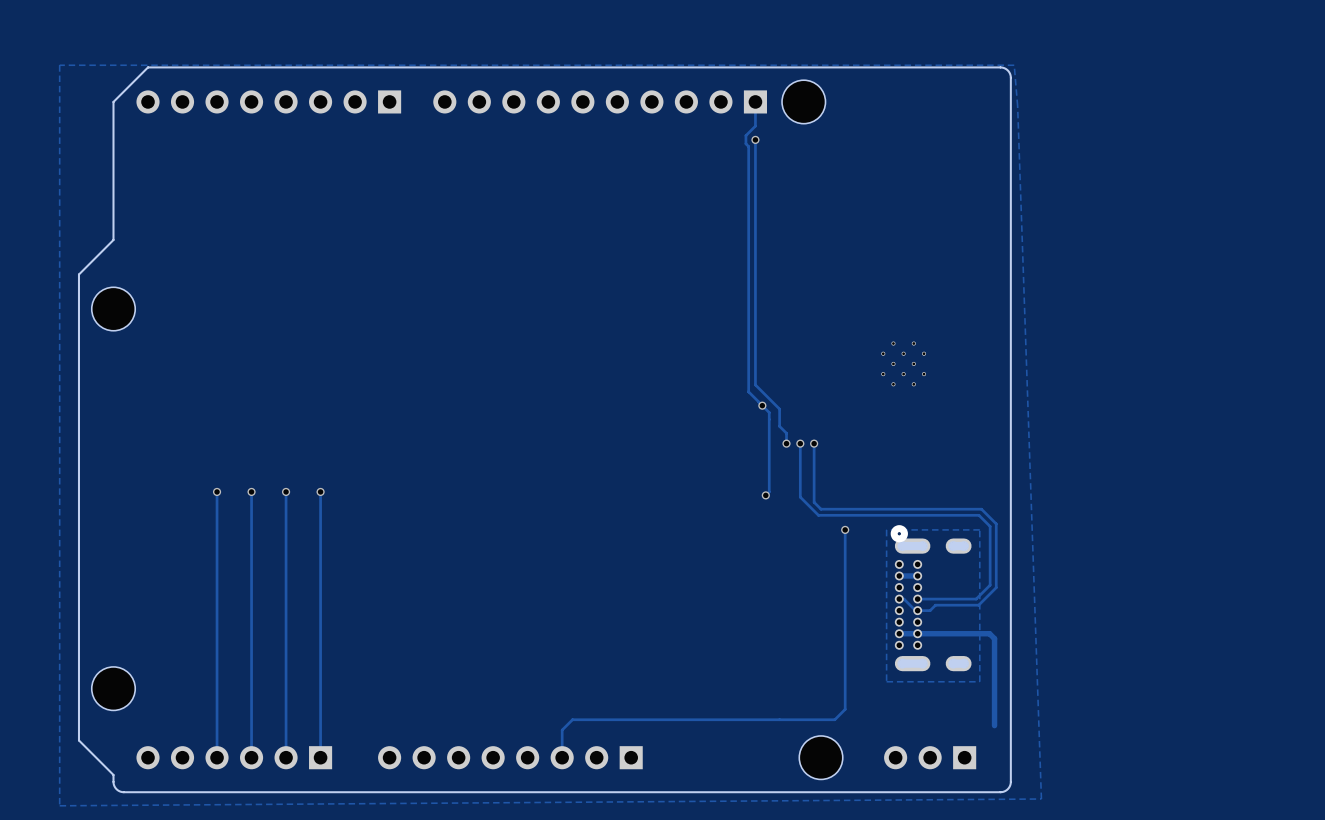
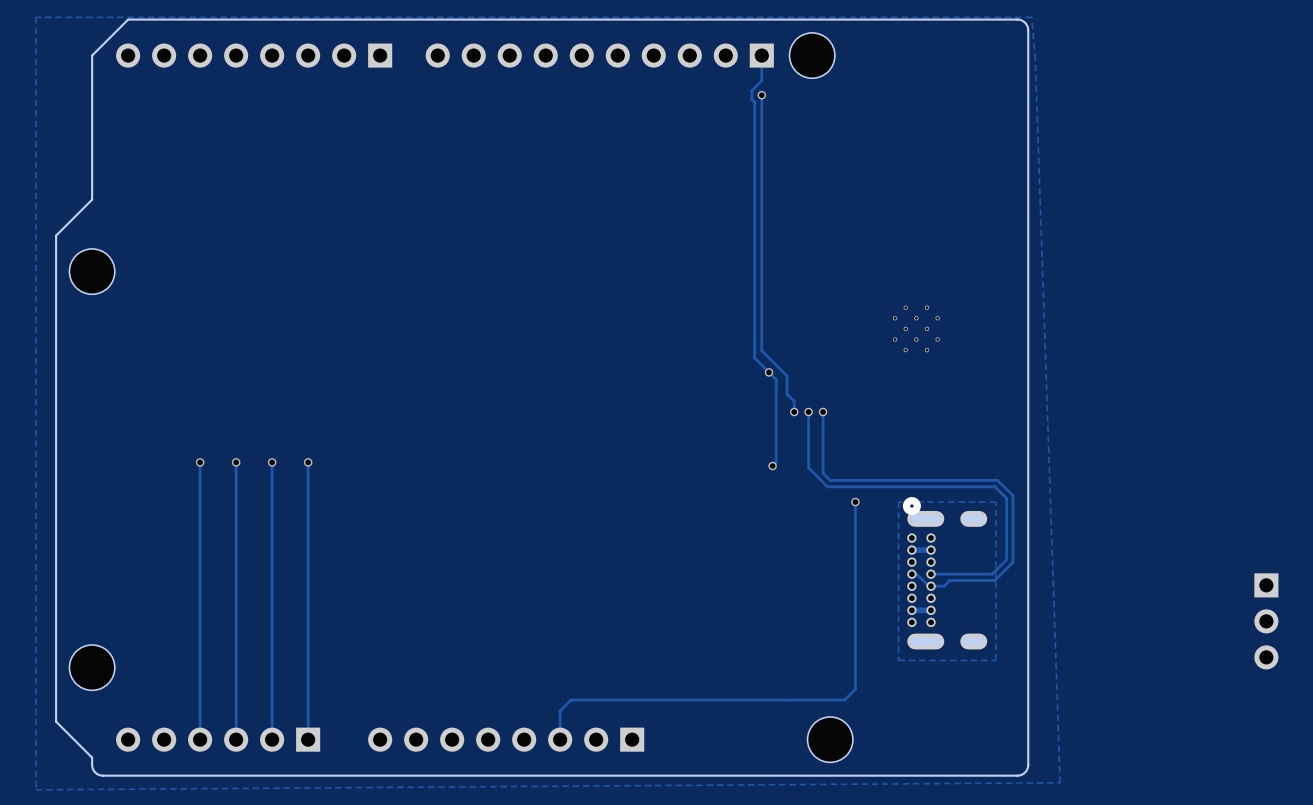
track: (917, 633) (989, 633) (994, 638) (994, 725) -> none
part rotation: 0° (930, 757) -> 90° counterclockwise (1266, 621)
part position: (930, 757) -> (1266, 621)

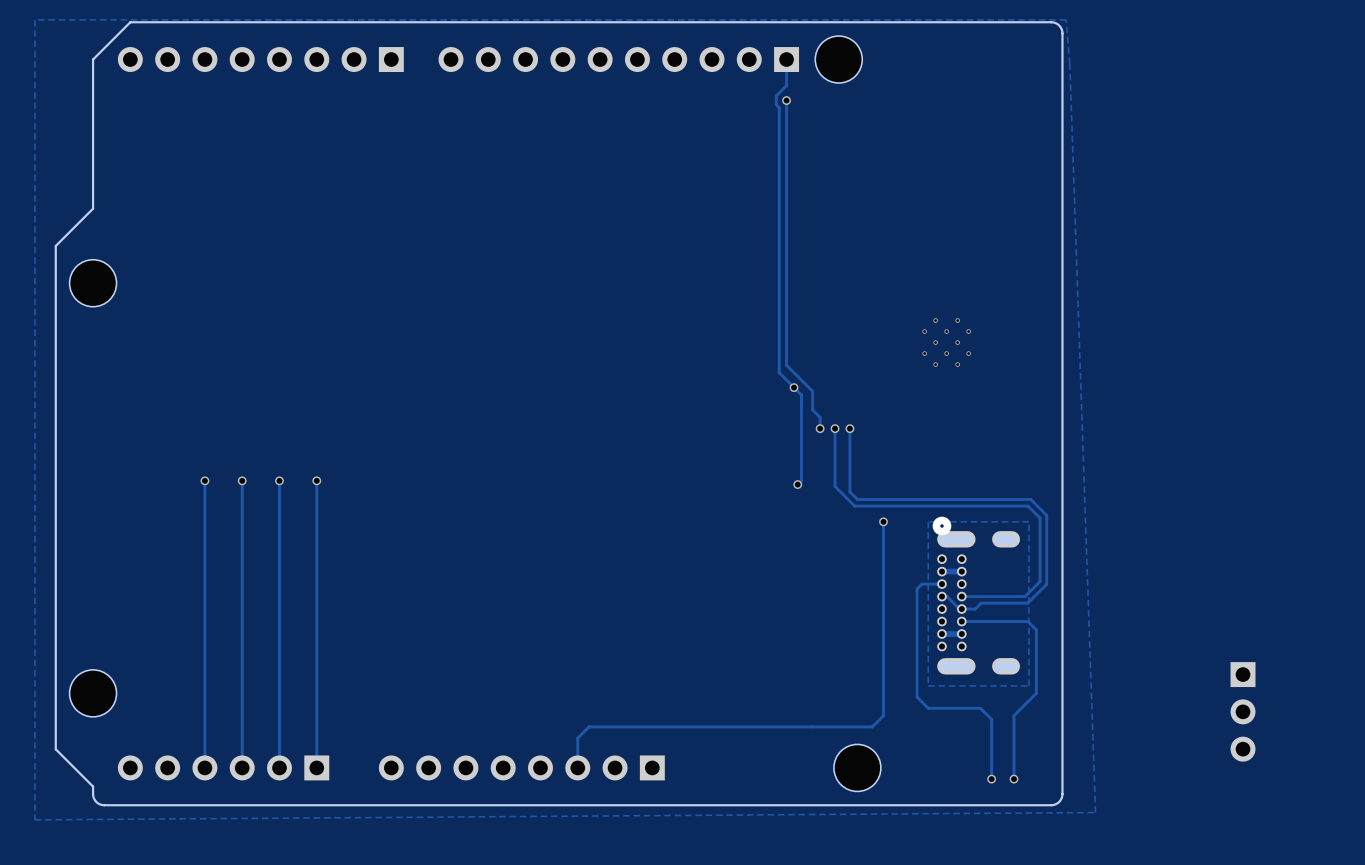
track: none -> (941, 584) (921, 584) (917, 588) (917, 697) (928, 708) (980, 708) (991, 719) (991, 779)
track: none -> (961, 621) (1027, 621) (1036, 629) (1036, 693) (1014, 715) (1014, 779)
part position: (1266, 621) -> (1243, 711)
via: none -> (991, 779)
via: none -> (1014, 779)

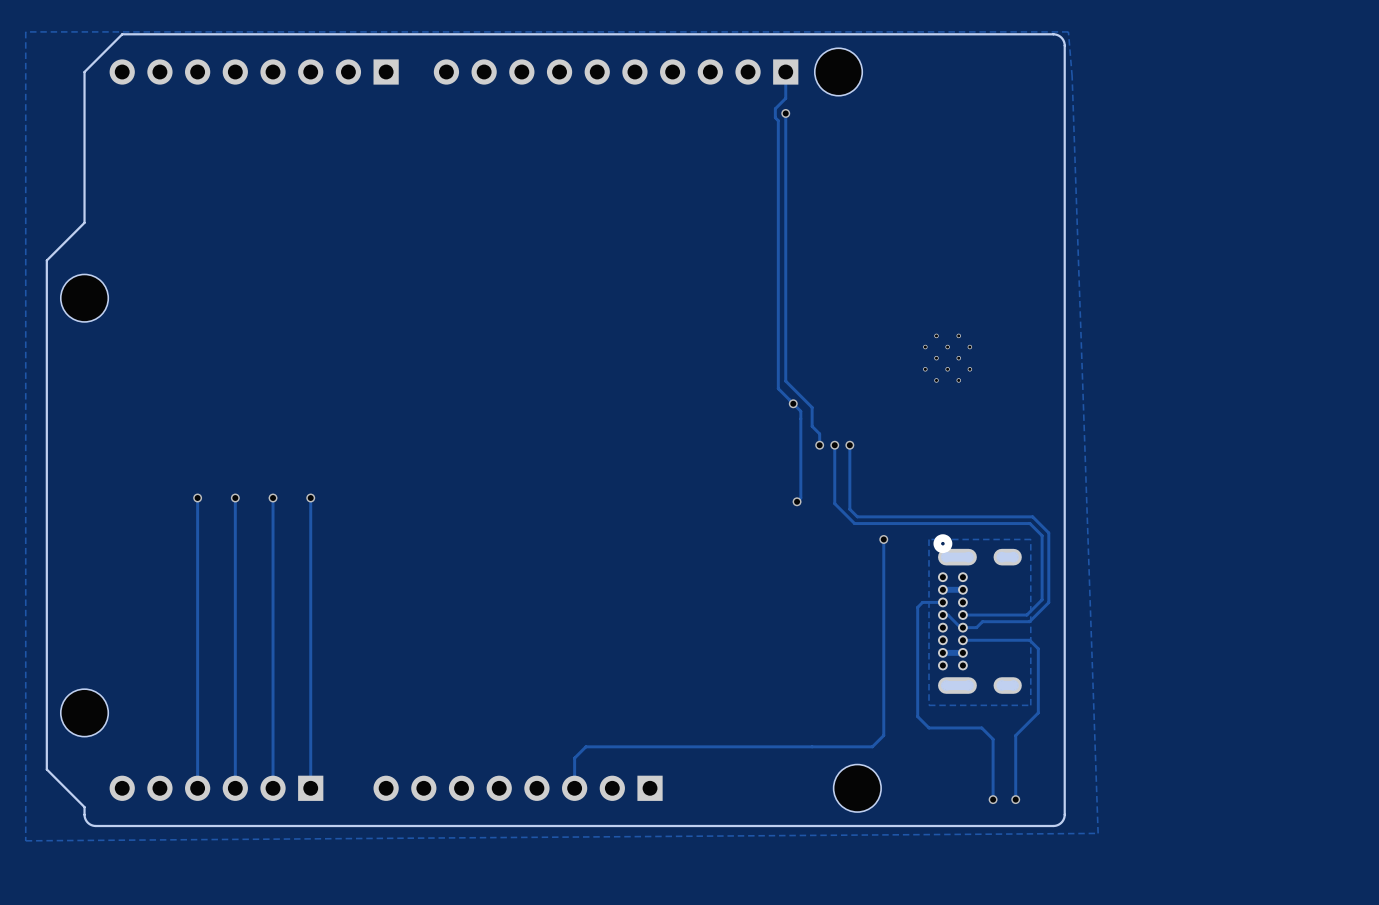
part: (1243, 711) -> none

